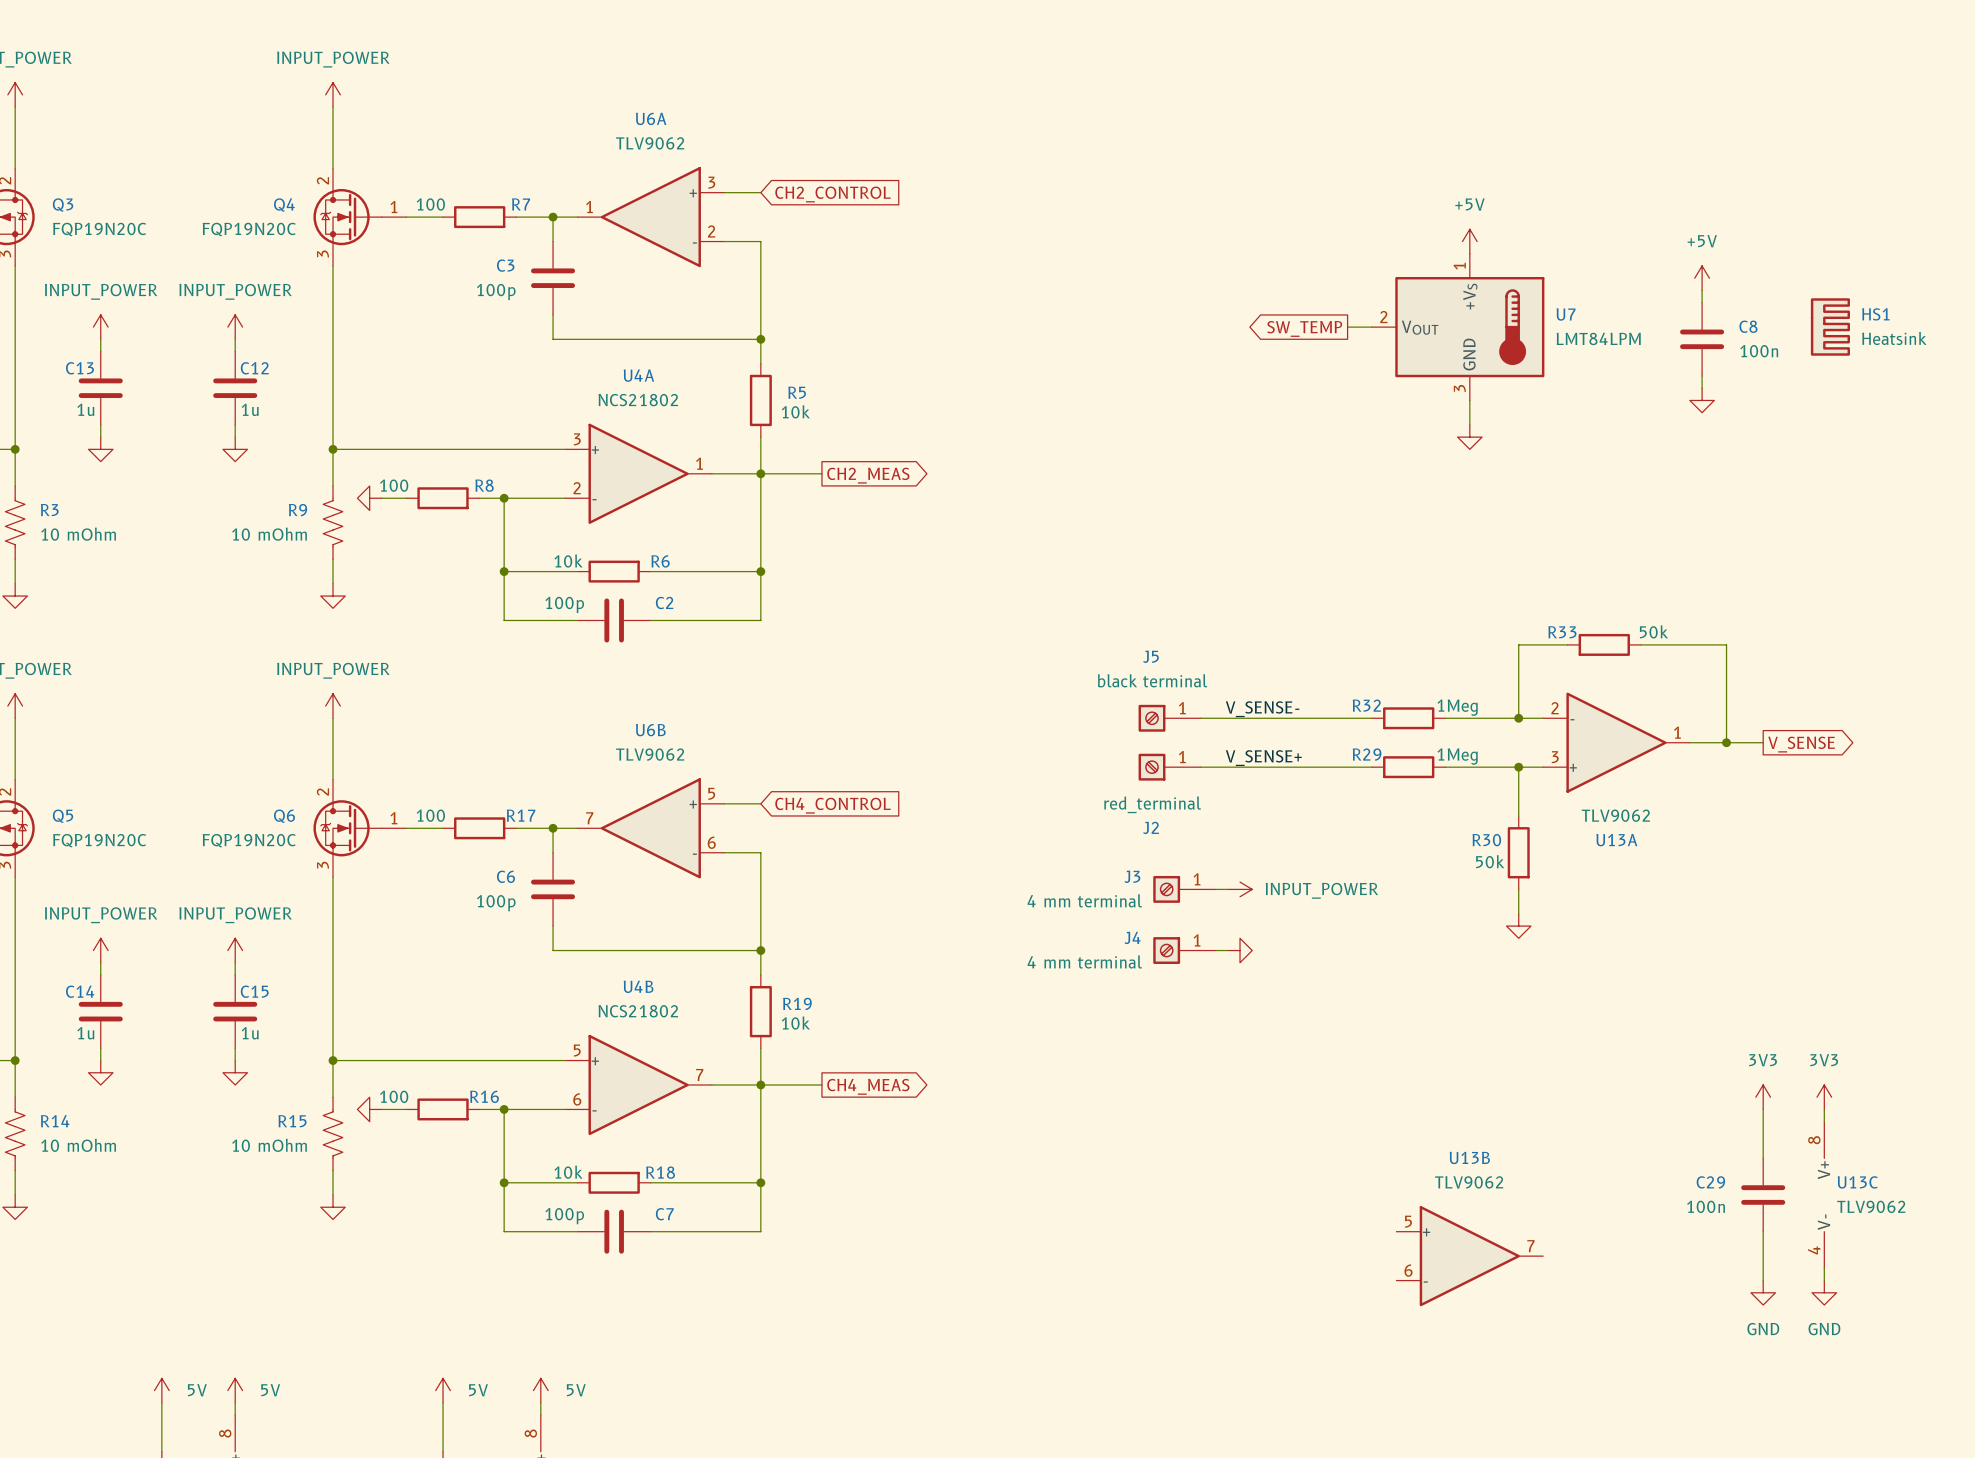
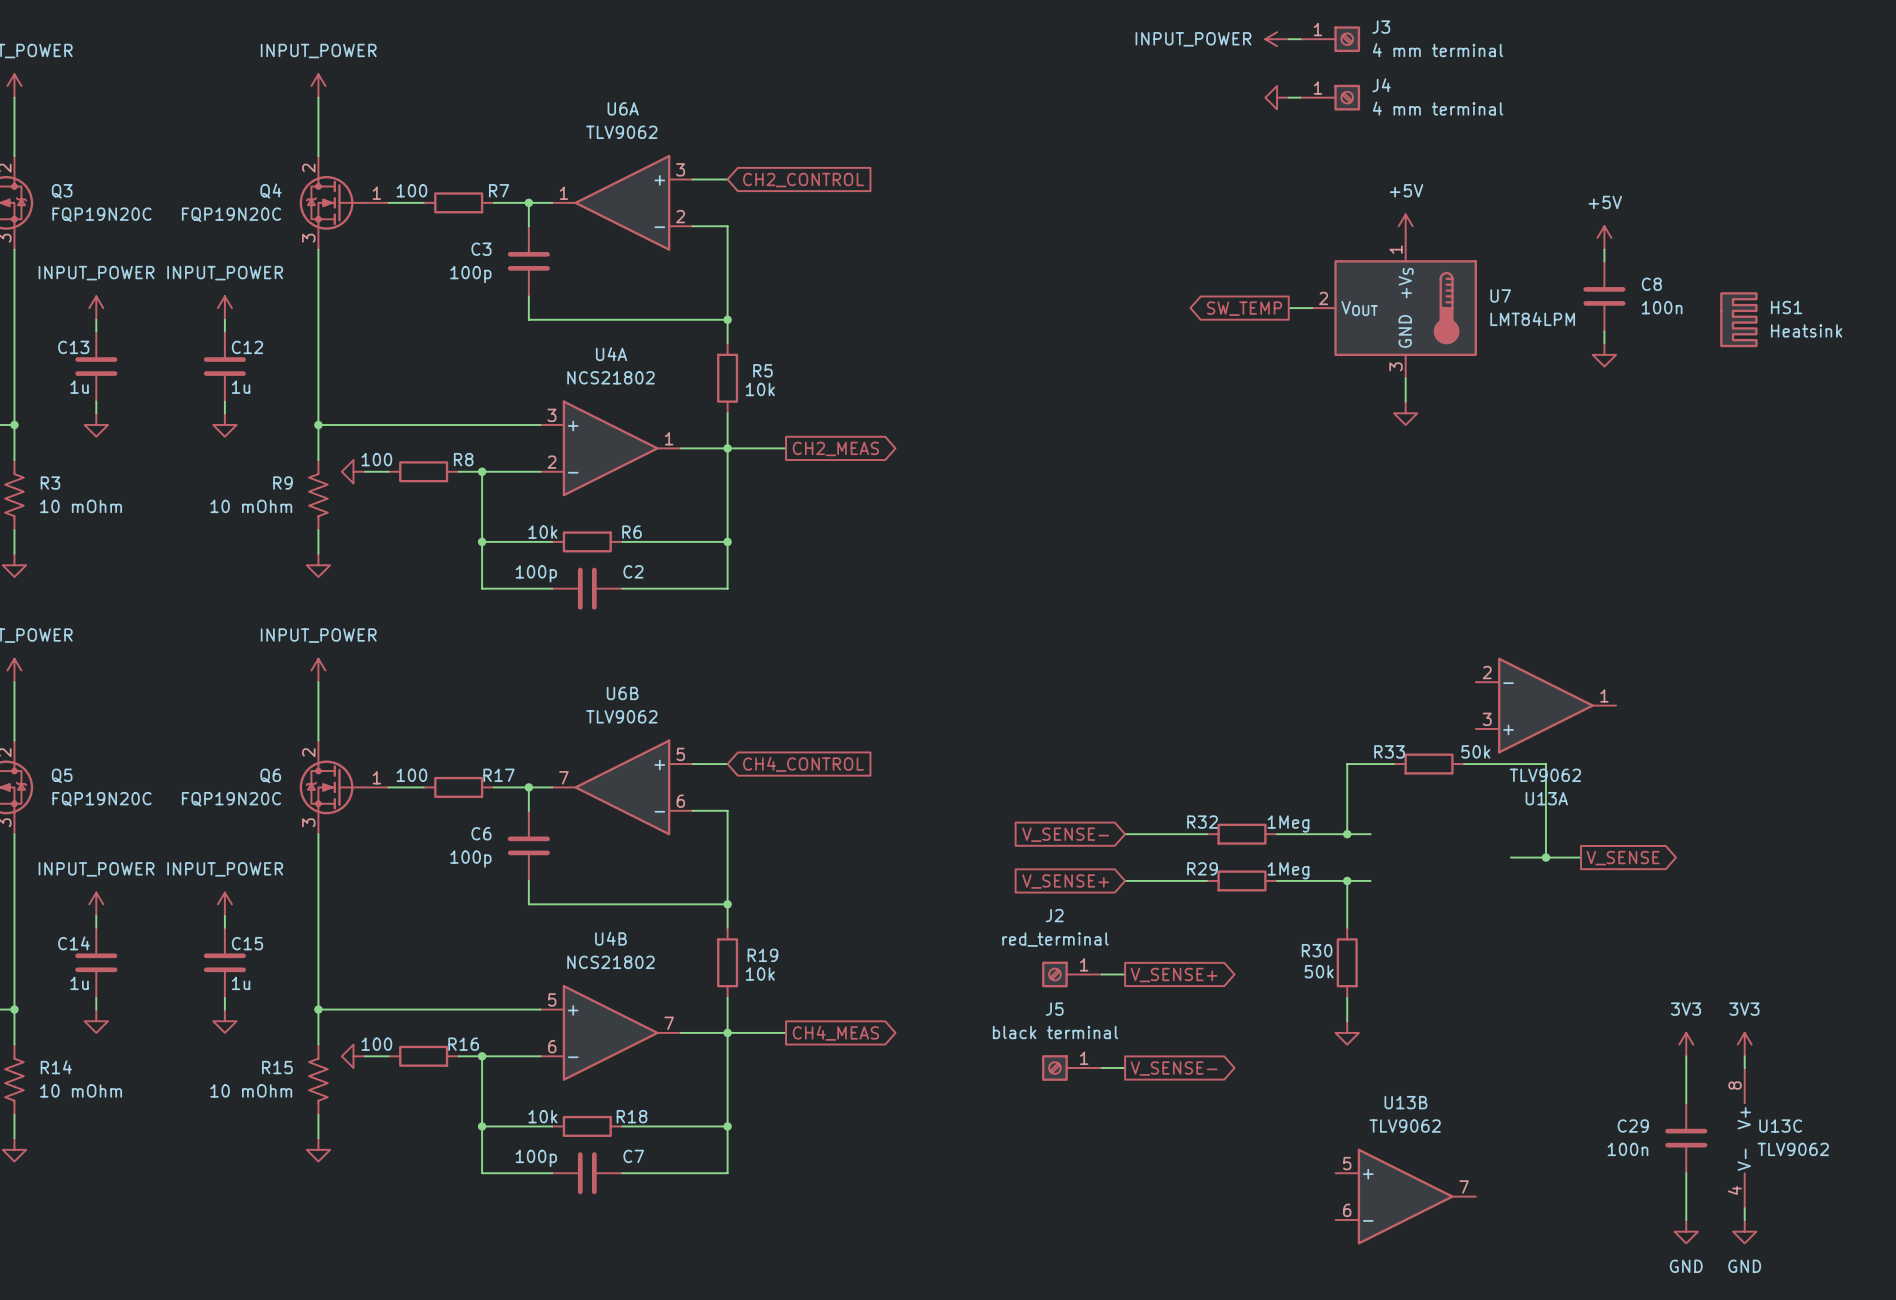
power symbol: none -> INPUT_POWER (1277, 39)
wire: none -> (1288, 39) (1300, 39)
power symbol: none -> (1277, 97)
wire: none -> (1288, 97) (1300, 97)
power symbol position: +5V (1702, 278) -> +5V (1604, 237)
wire: (1702, 290) (1702, 302) -> (1604, 249) (1604, 261)
HS1 position: (1830, 326) -> (1738, 319)
C8 position: (1702, 339) -> (1604, 296)
wire: (1702, 376) (1702, 388) -> (1604, 331) (1604, 343)
power symbol position: (1702, 400) -> (1604, 354)
wire: (1567, 644) (1518, 644) (1518, 718) -> (1393, 764) (1347, 764) (1347, 834)
R33 position: (1604, 644) -> (1429, 764)
wire: (1640, 644) (1726, 644) (1726, 742) -> (1464, 764) (1545, 764) (1545, 857)
label: V_SENSE- (1262, 709) -> none
J5 position: (1169, 718) -> (1071, 1068)
wire: (1200, 718) (1372, 718) -> none
R32 position: (1408, 718) -> (1242, 834)
wire: (1445, 718) (1543, 718) -> (1277, 834) (1370, 834)
junction: (1518, 718) -> none
wire: (1689, 742) (1763, 742) -> (1510, 857) (1581, 857)
junction: (1726, 742) -> none
global label position: V_SENSE (1801, 744) -> V_SENSE (1623, 858)
label: V_SENSE+ (1263, 758) -> none
J2 flip: as is (1152, 767) -> up-down (1054, 974)
J2 position: (1169, 767) -> (1071, 974)
wire: (1200, 767) (1372, 767) -> none
R29 position: (1408, 767) -> (1242, 880)
wire: (1445, 767) (1543, 767) -> (1277, 880) (1370, 880)
wire: (1518, 767) (1518, 816) -> (1347, 880) (1347, 927)
junction: (1518, 767) -> none
R30 position: (1518, 852) -> (1347, 962)
wire: none -> (1125, 834) (1206, 834)
junction: none -> (1347, 834)
global label: none -> V_SENSE- (1065, 834)
J3 flip: as is (1166, 889) -> left-right (1347, 39)
J3 position: (1184, 889) -> (1330, 39)
wire: (1215, 889) (1227, 889) -> none
power symbol: INPUT_POWER (1240, 889) -> none
wire: (1518, 889) (1518, 913) -> (1347, 997) (1347, 1021)
junction: none -> (1545, 857)
wire: none -> (1125, 880) (1206, 880)
junction: none -> (1347, 880)
power symbol: (1518, 926) -> none
global label: none -> V_SENSE+ (1065, 881)
J4 flip: as is (1166, 950) -> left-right (1347, 97)
J4 position: (1184, 950) -> (1330, 97)
wire: (1215, 950) (1227, 950) -> none
power symbol: (1240, 950) -> none
wire: none -> (1101, 974) (1125, 974)
global label: none -> V_SENSE+ (1174, 975)
power symbol: none -> (1347, 1032)
wire: none -> (1101, 1068) (1125, 1068)
global label: none -> V_SENSE- (1174, 1068)

